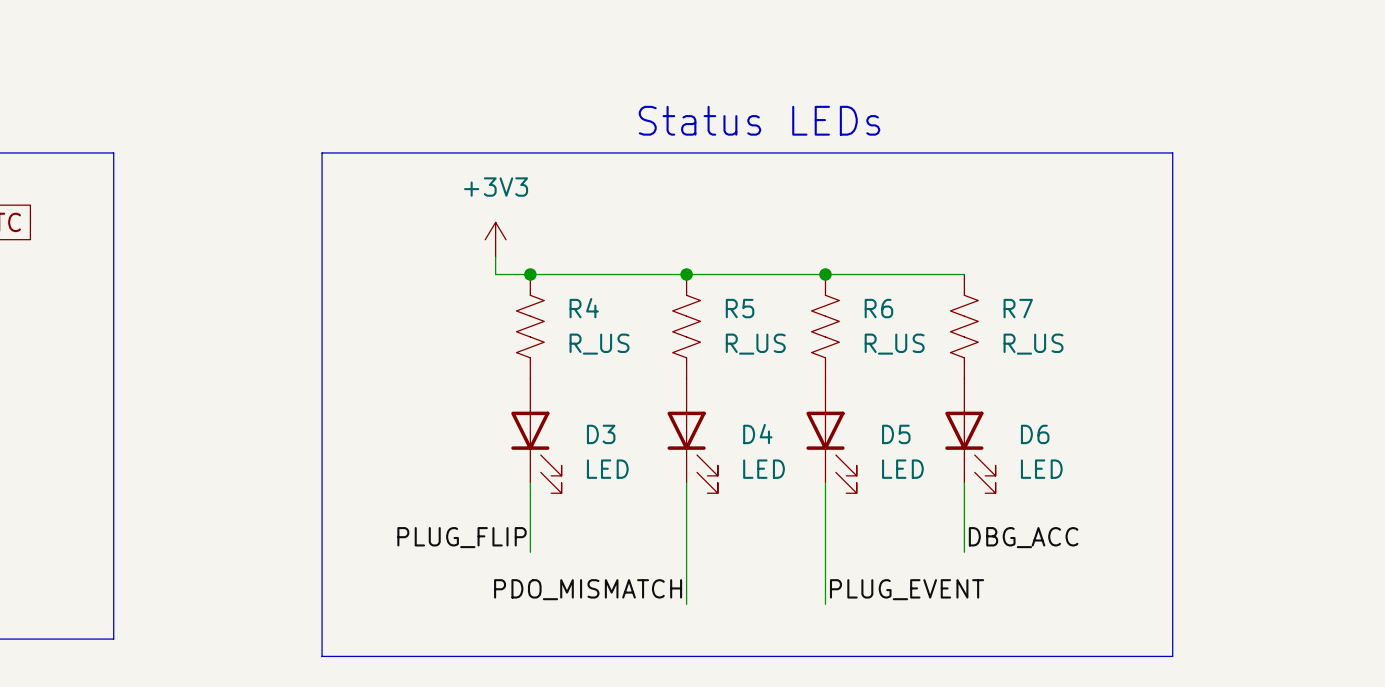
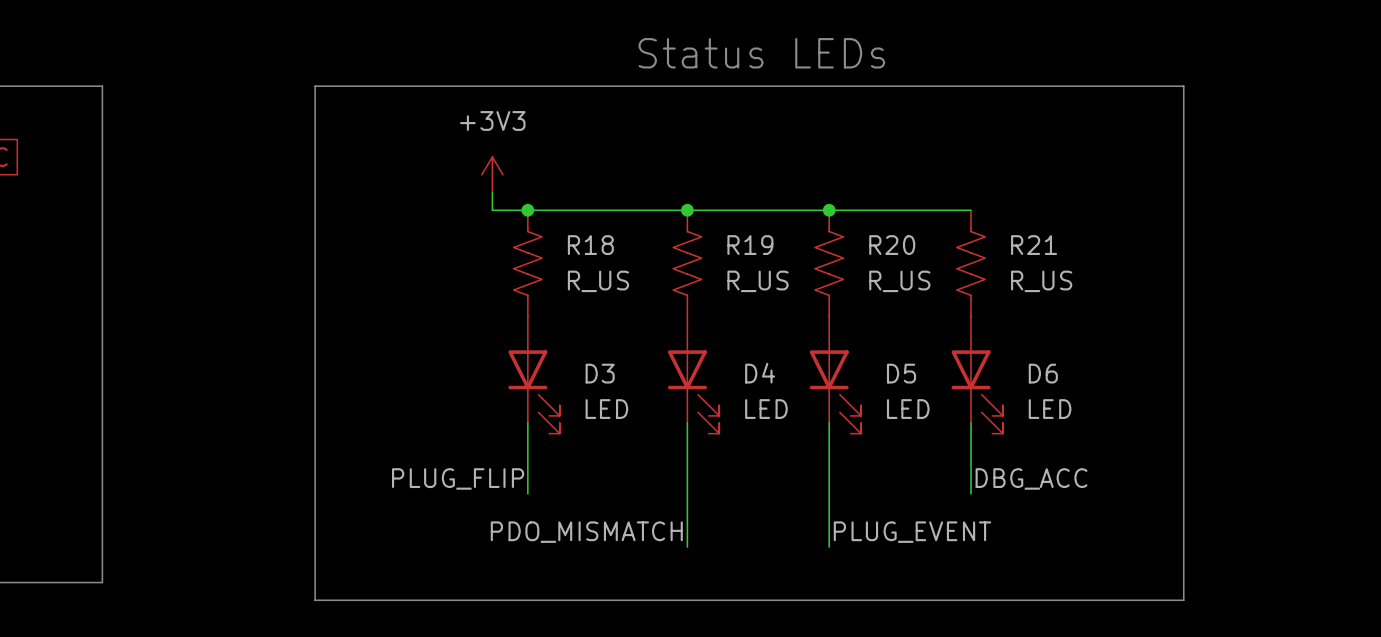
R4 name: R4 (584, 308) -> R18 (590, 245)
R5 name: R5 (740, 308) -> R19 (750, 245)
R6 name: R6 (878, 308) -> R20 (892, 245)
R7 name: R7 (1018, 308) -> R21 (1034, 245)

